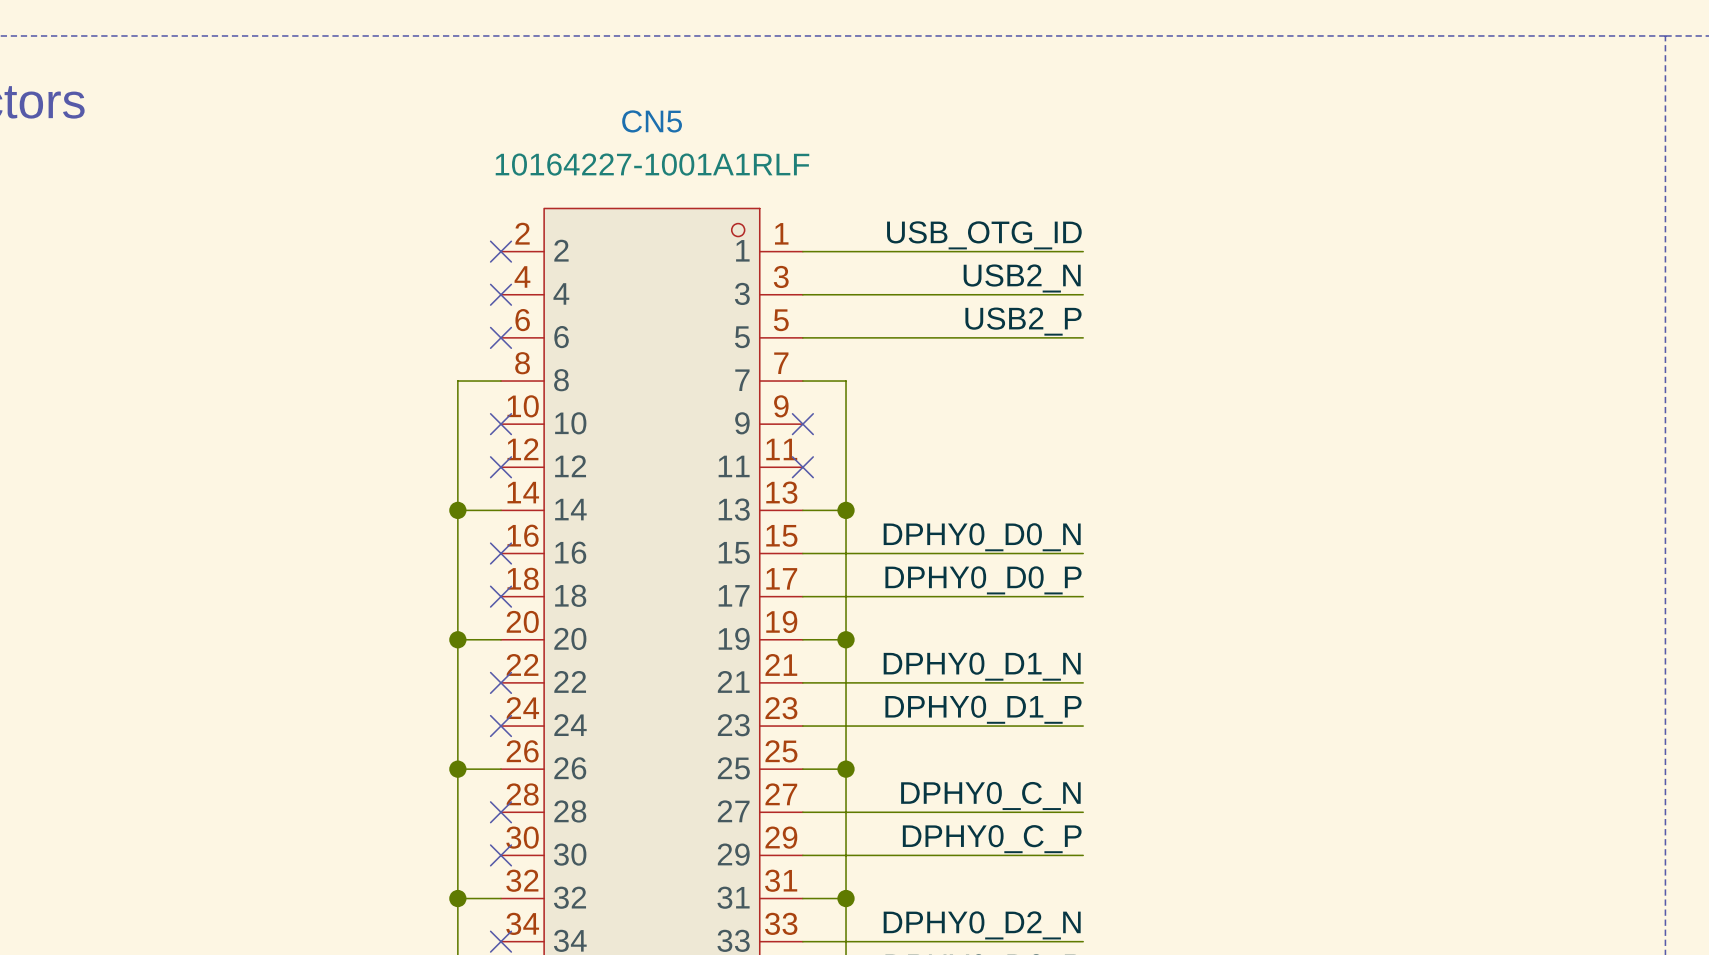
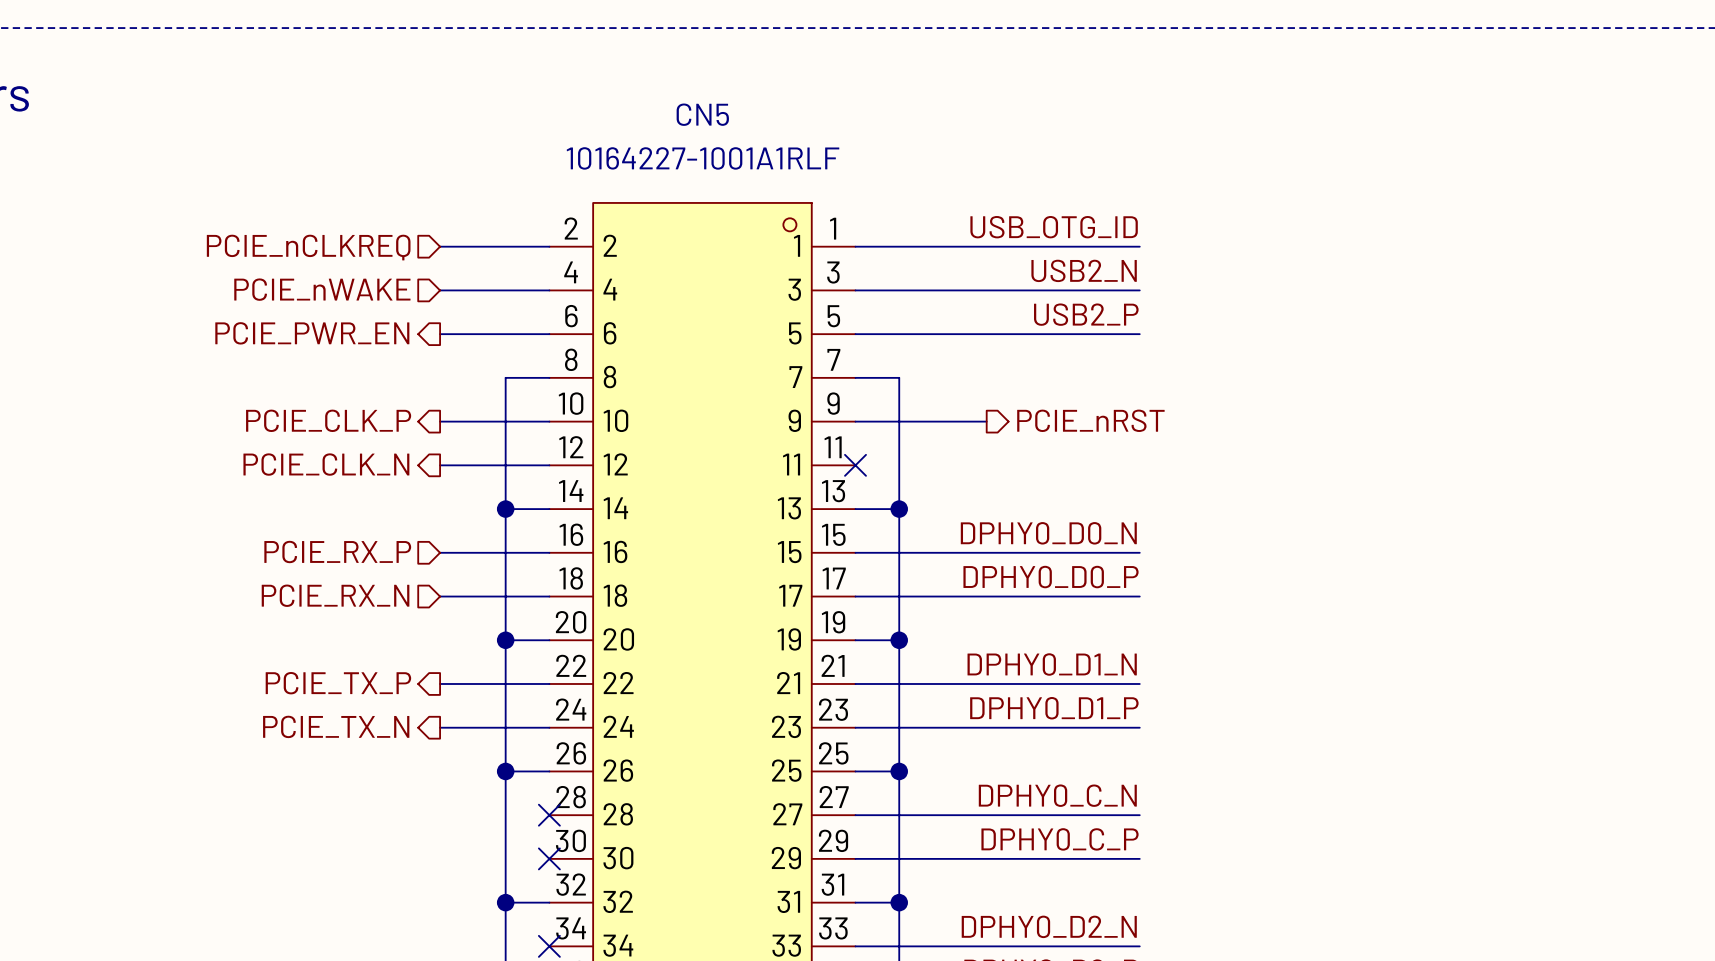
wire: none -> (440, 246) (549, 246)
no-connect mark: (500, 251) -> none
hierarchical label: none -> PCIE_nCLKREQ (308, 247)
wire: none -> (440, 290) (549, 290)
no-connect mark: (500, 294) -> none
hierarchical label: none -> PCIE_nWAKE (322, 289)
wire: none -> (440, 334) (549, 334)
no-connect mark: (500, 337) -> none
hierarchical label: none -> PCIE_PWR_EN (312, 333)
wire: none -> (440, 421) (549, 421)
no-connect mark: (500, 424) -> none
wire: none -> (855, 421) (986, 421)
no-connect mark: (802, 424) -> none
hierarchical label: none -> PCIE_CLK_P (328, 420)
hierarchical label: none -> PCIE_nRST (1090, 420)
wire: none -> (440, 465) (549, 465)
no-connect mark: (500, 467) -> none
hierarchical label: none -> PCIE_CLK_N (326, 464)
wire: none -> (440, 552) (549, 552)
no-connect mark: (500, 553) -> none
hierarchical label: none -> PCIE_RX_P (337, 552)
wire: none -> (440, 596) (549, 596)
no-connect mark: (500, 596) -> none
hierarchical label: none -> PCIE_RX_N (335, 595)
wire: none -> (440, 683) (549, 683)
no-connect mark: (500, 682) -> none
hierarchical label: none -> PCIE_TX_P (338, 683)
wire: none -> (440, 727) (549, 727)
no-connect mark: (500, 726) -> none
hierarchical label: none -> PCIE_TX_N (336, 726)

